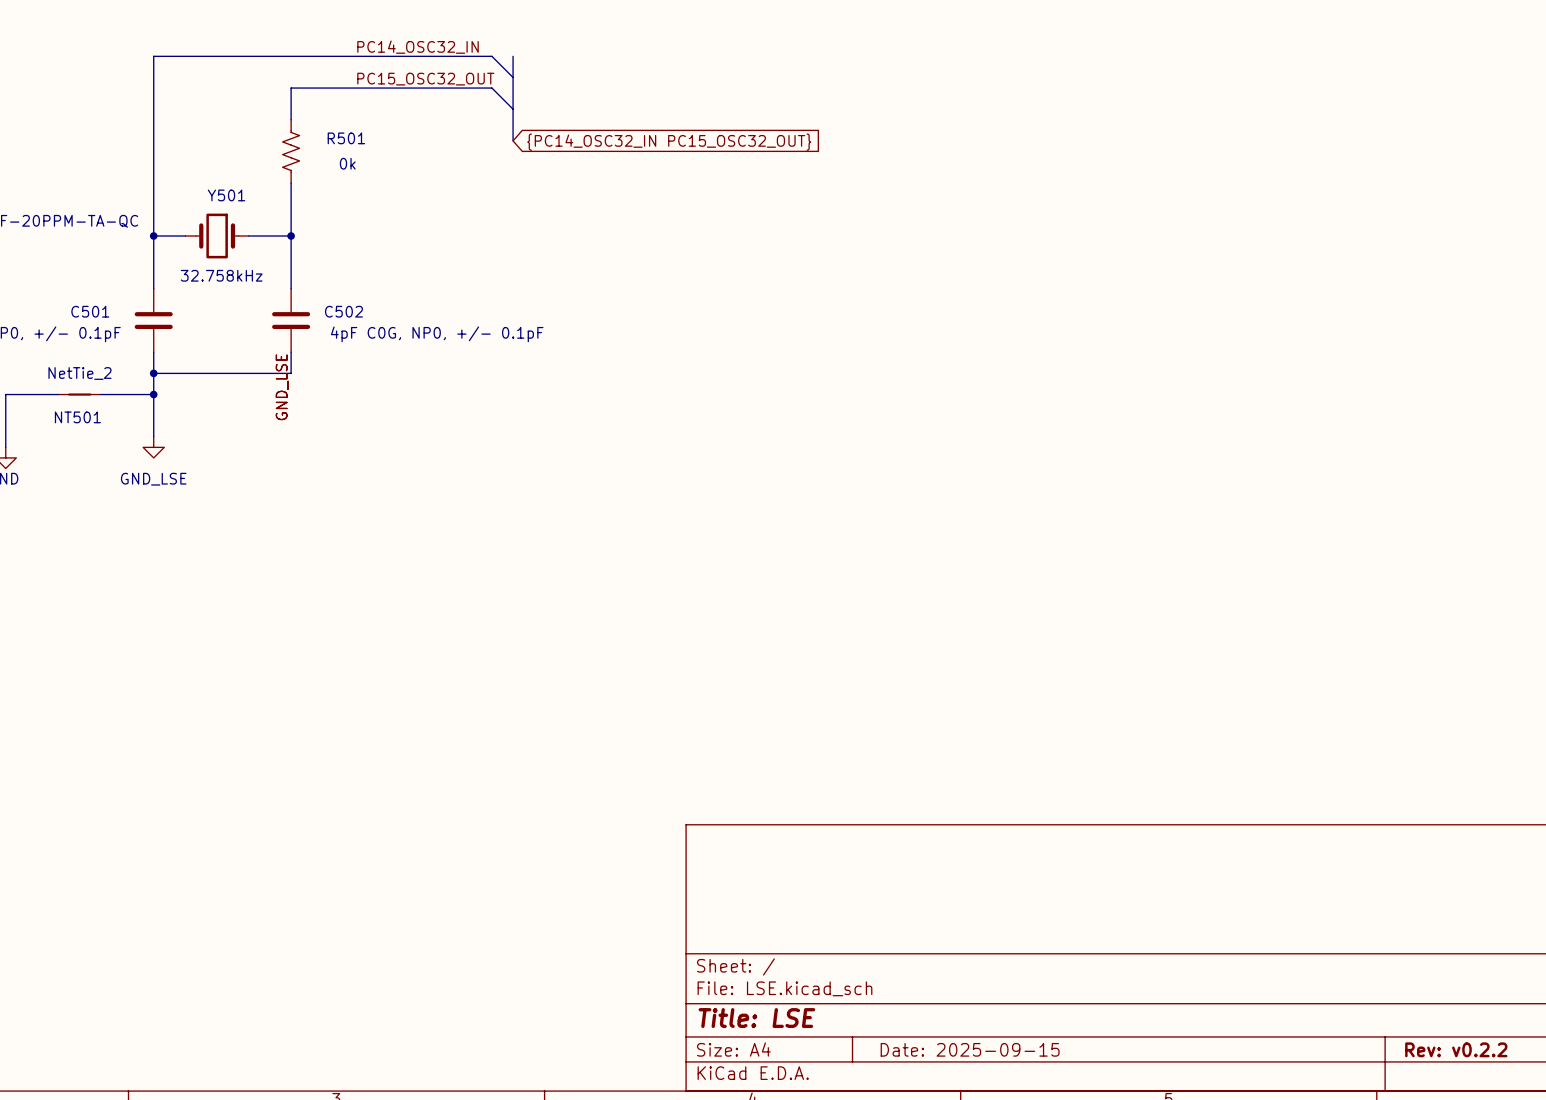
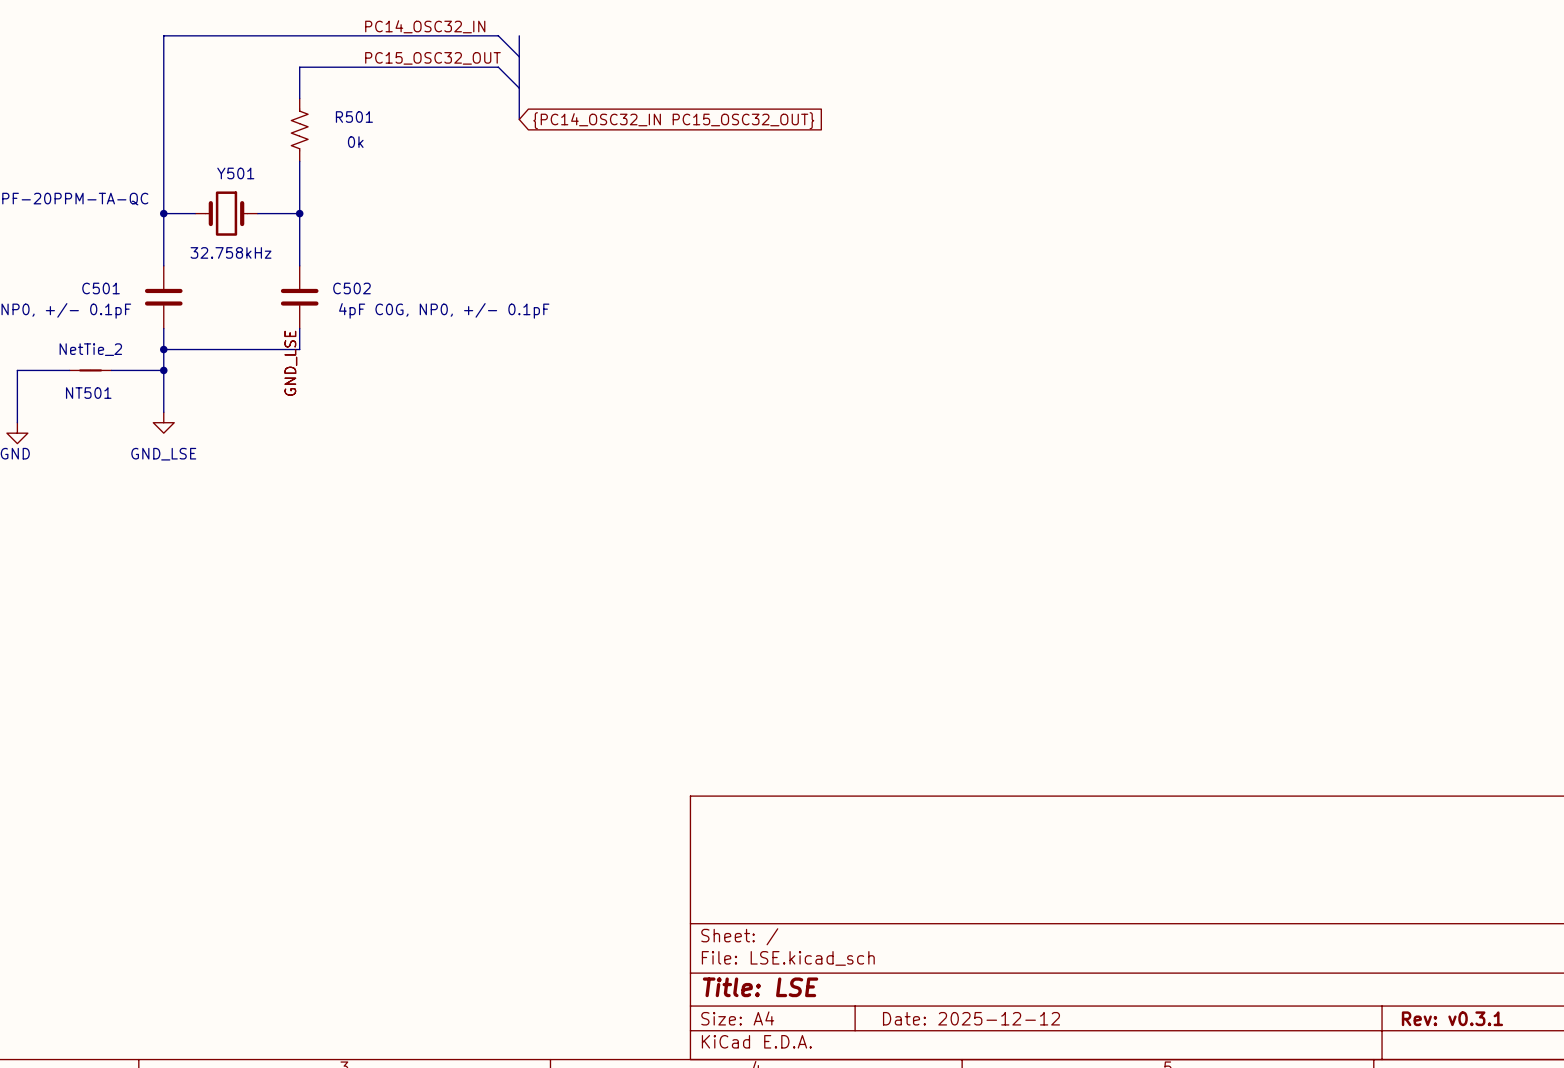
title block: Date: 2025-09-15 (970, 1049) -> Date: 2025-12-12 (971, 1018)
title block: Rev: v0.2.2 (1456, 1049) -> Rev: v0.3.1 (1452, 1018)

